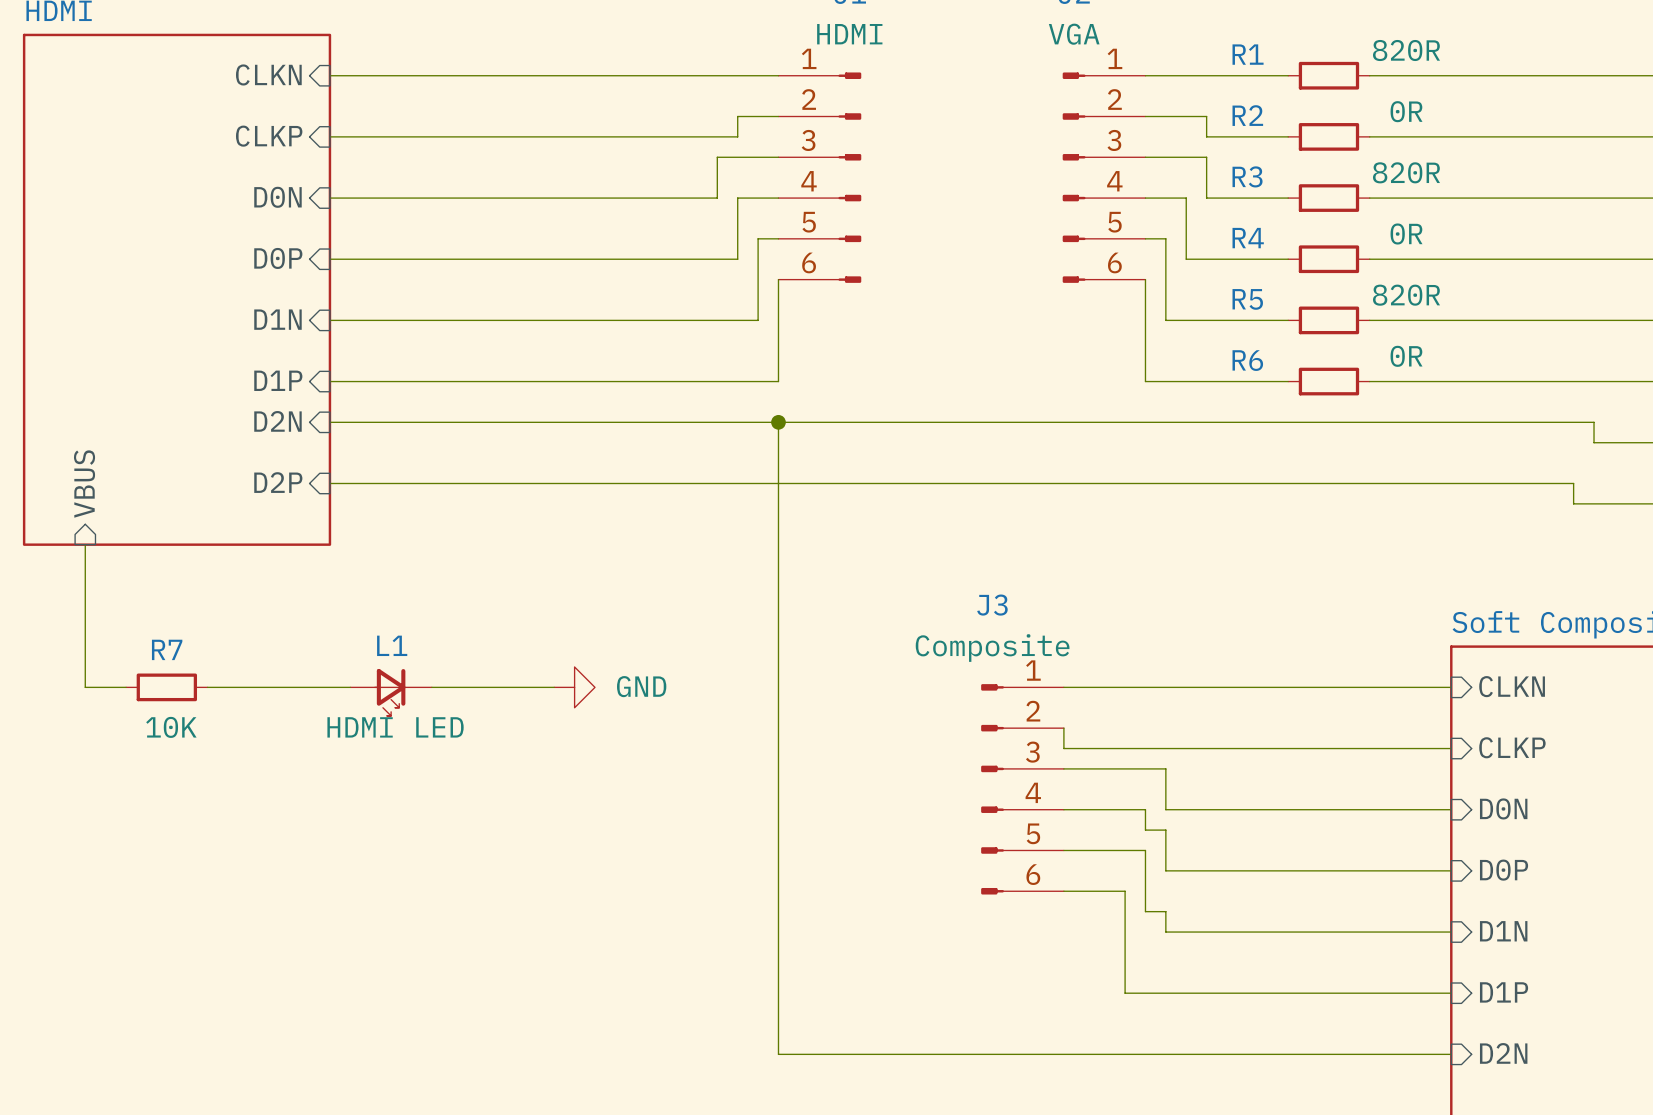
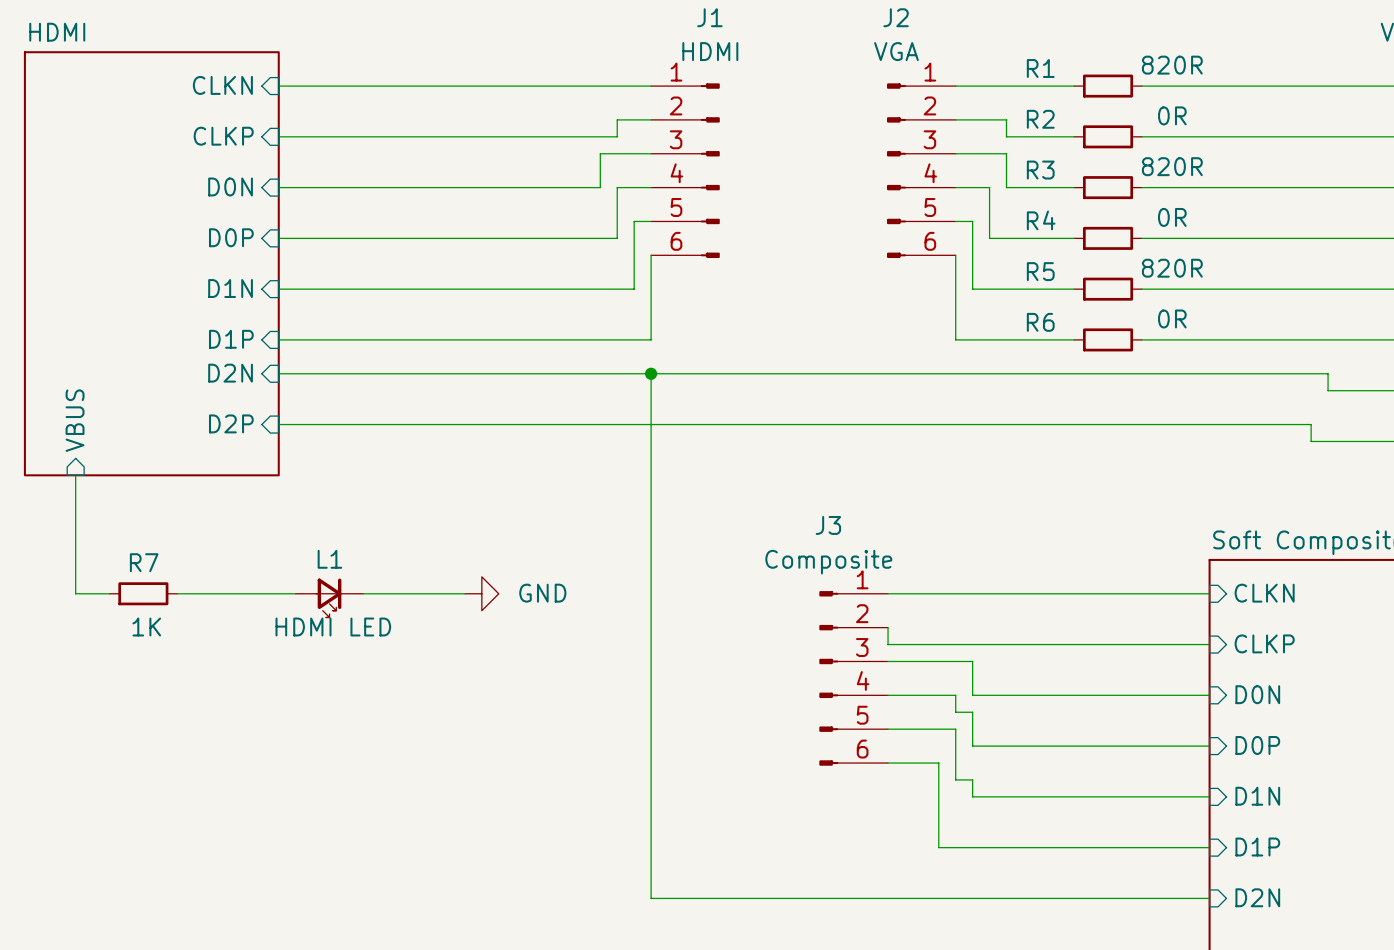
R7 value: 10K (171, 727) -> 1K (146, 627)

